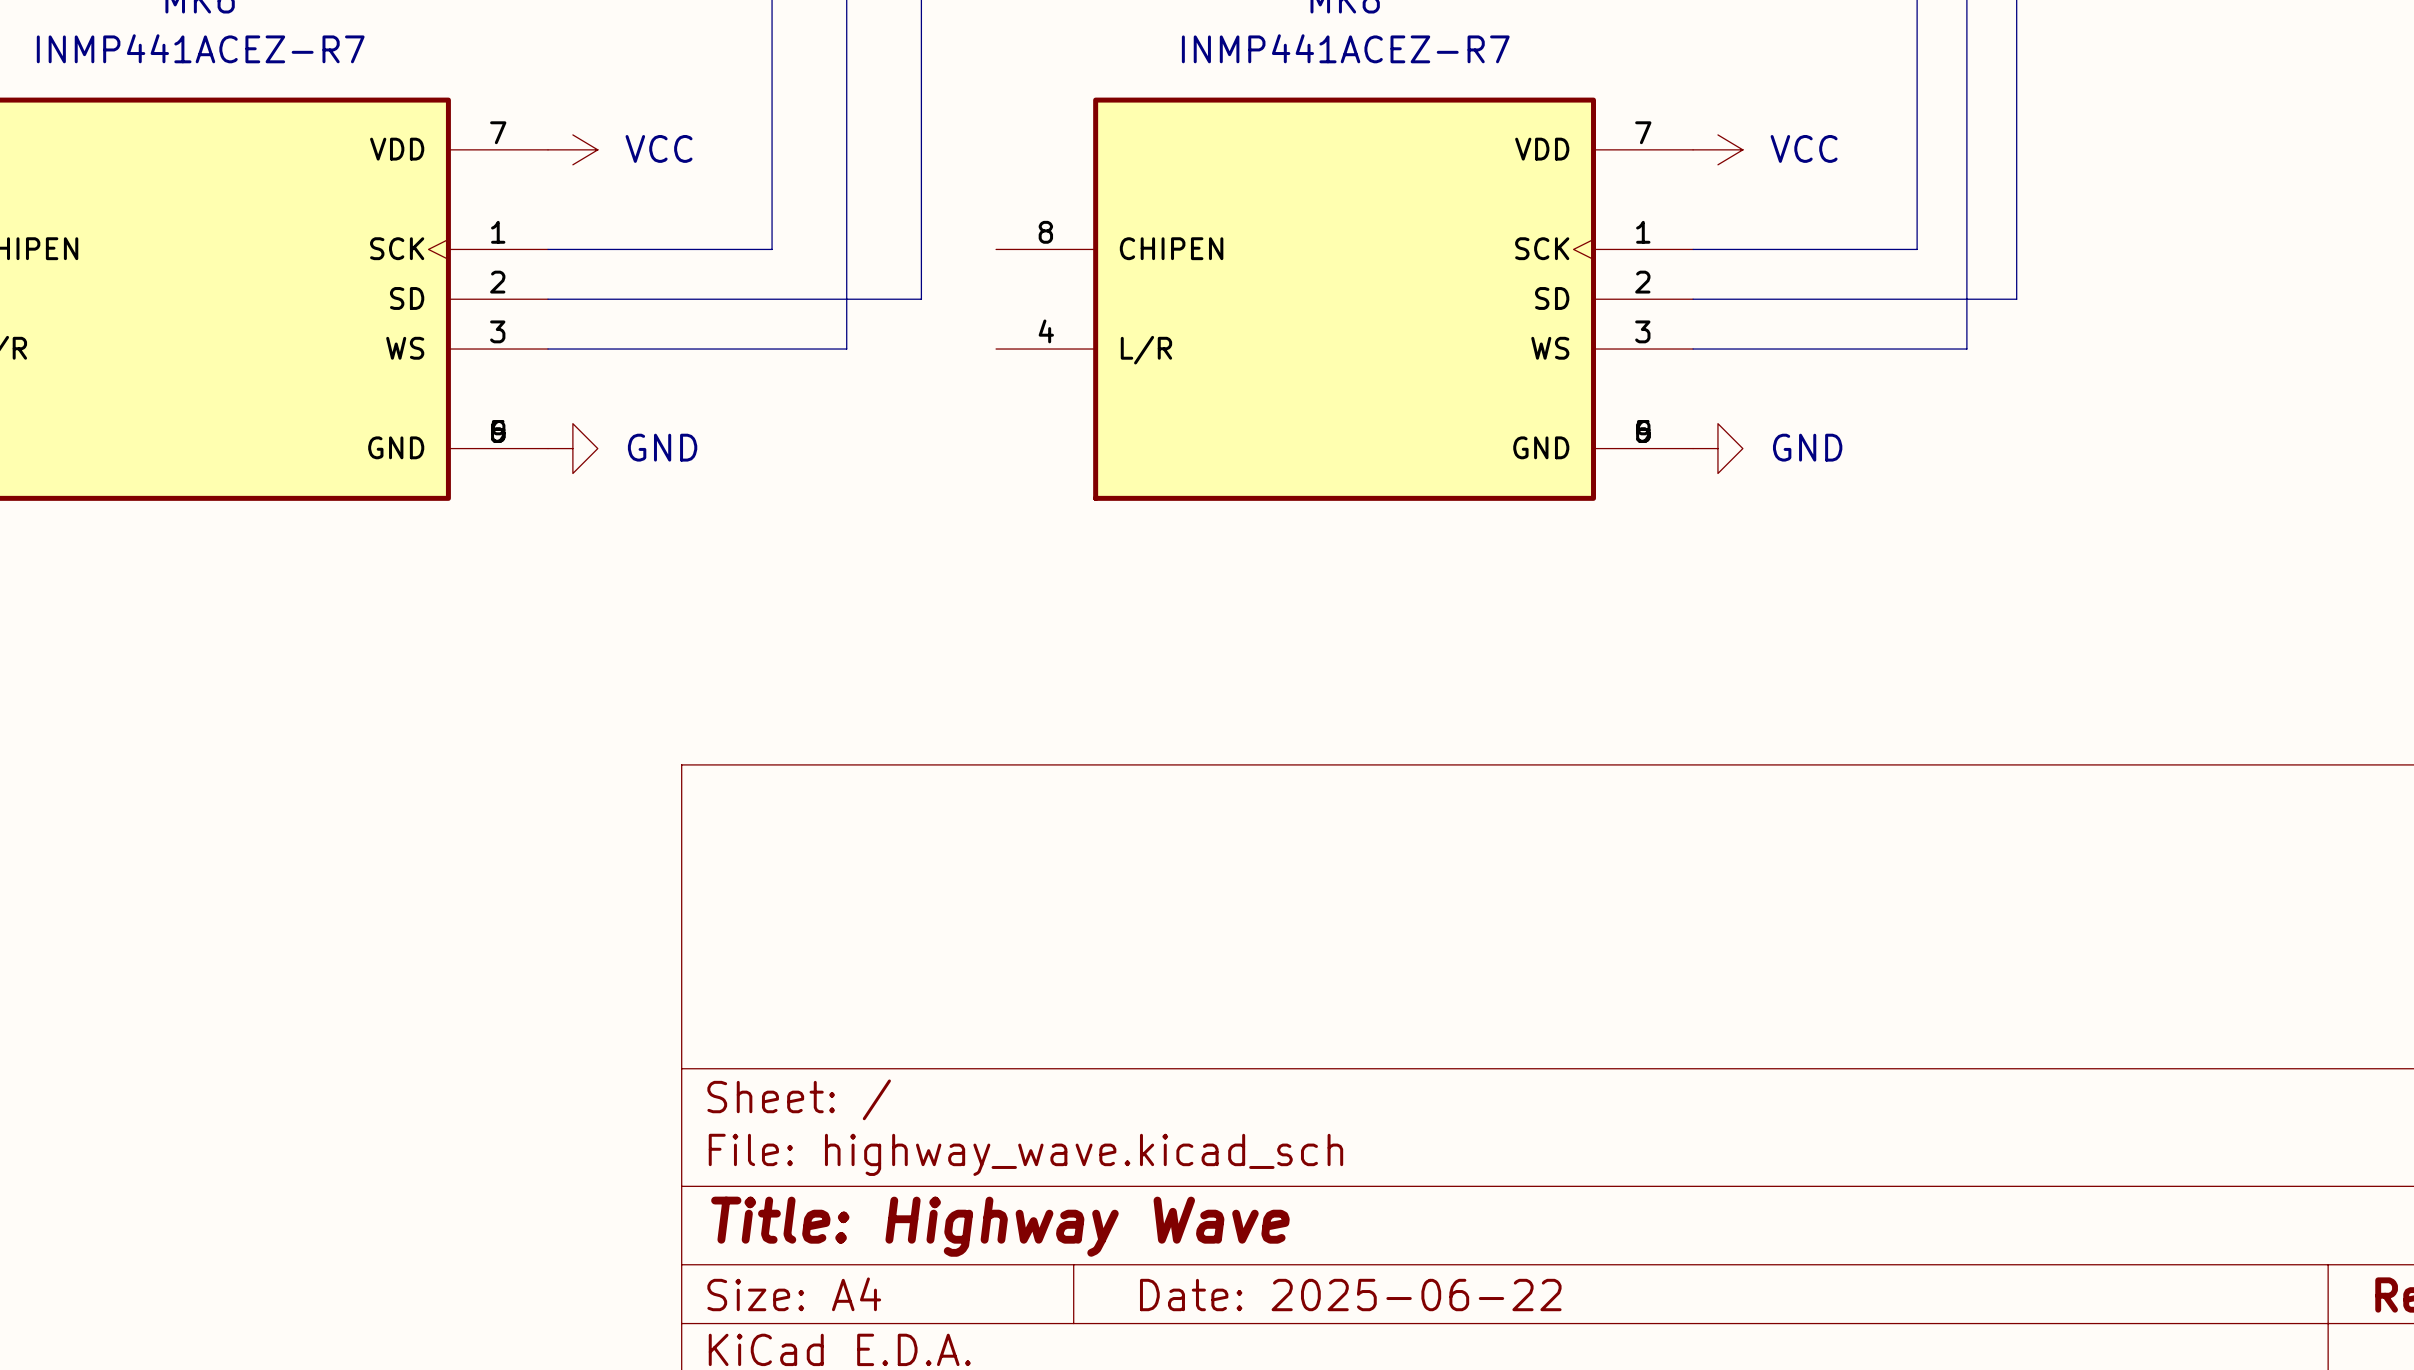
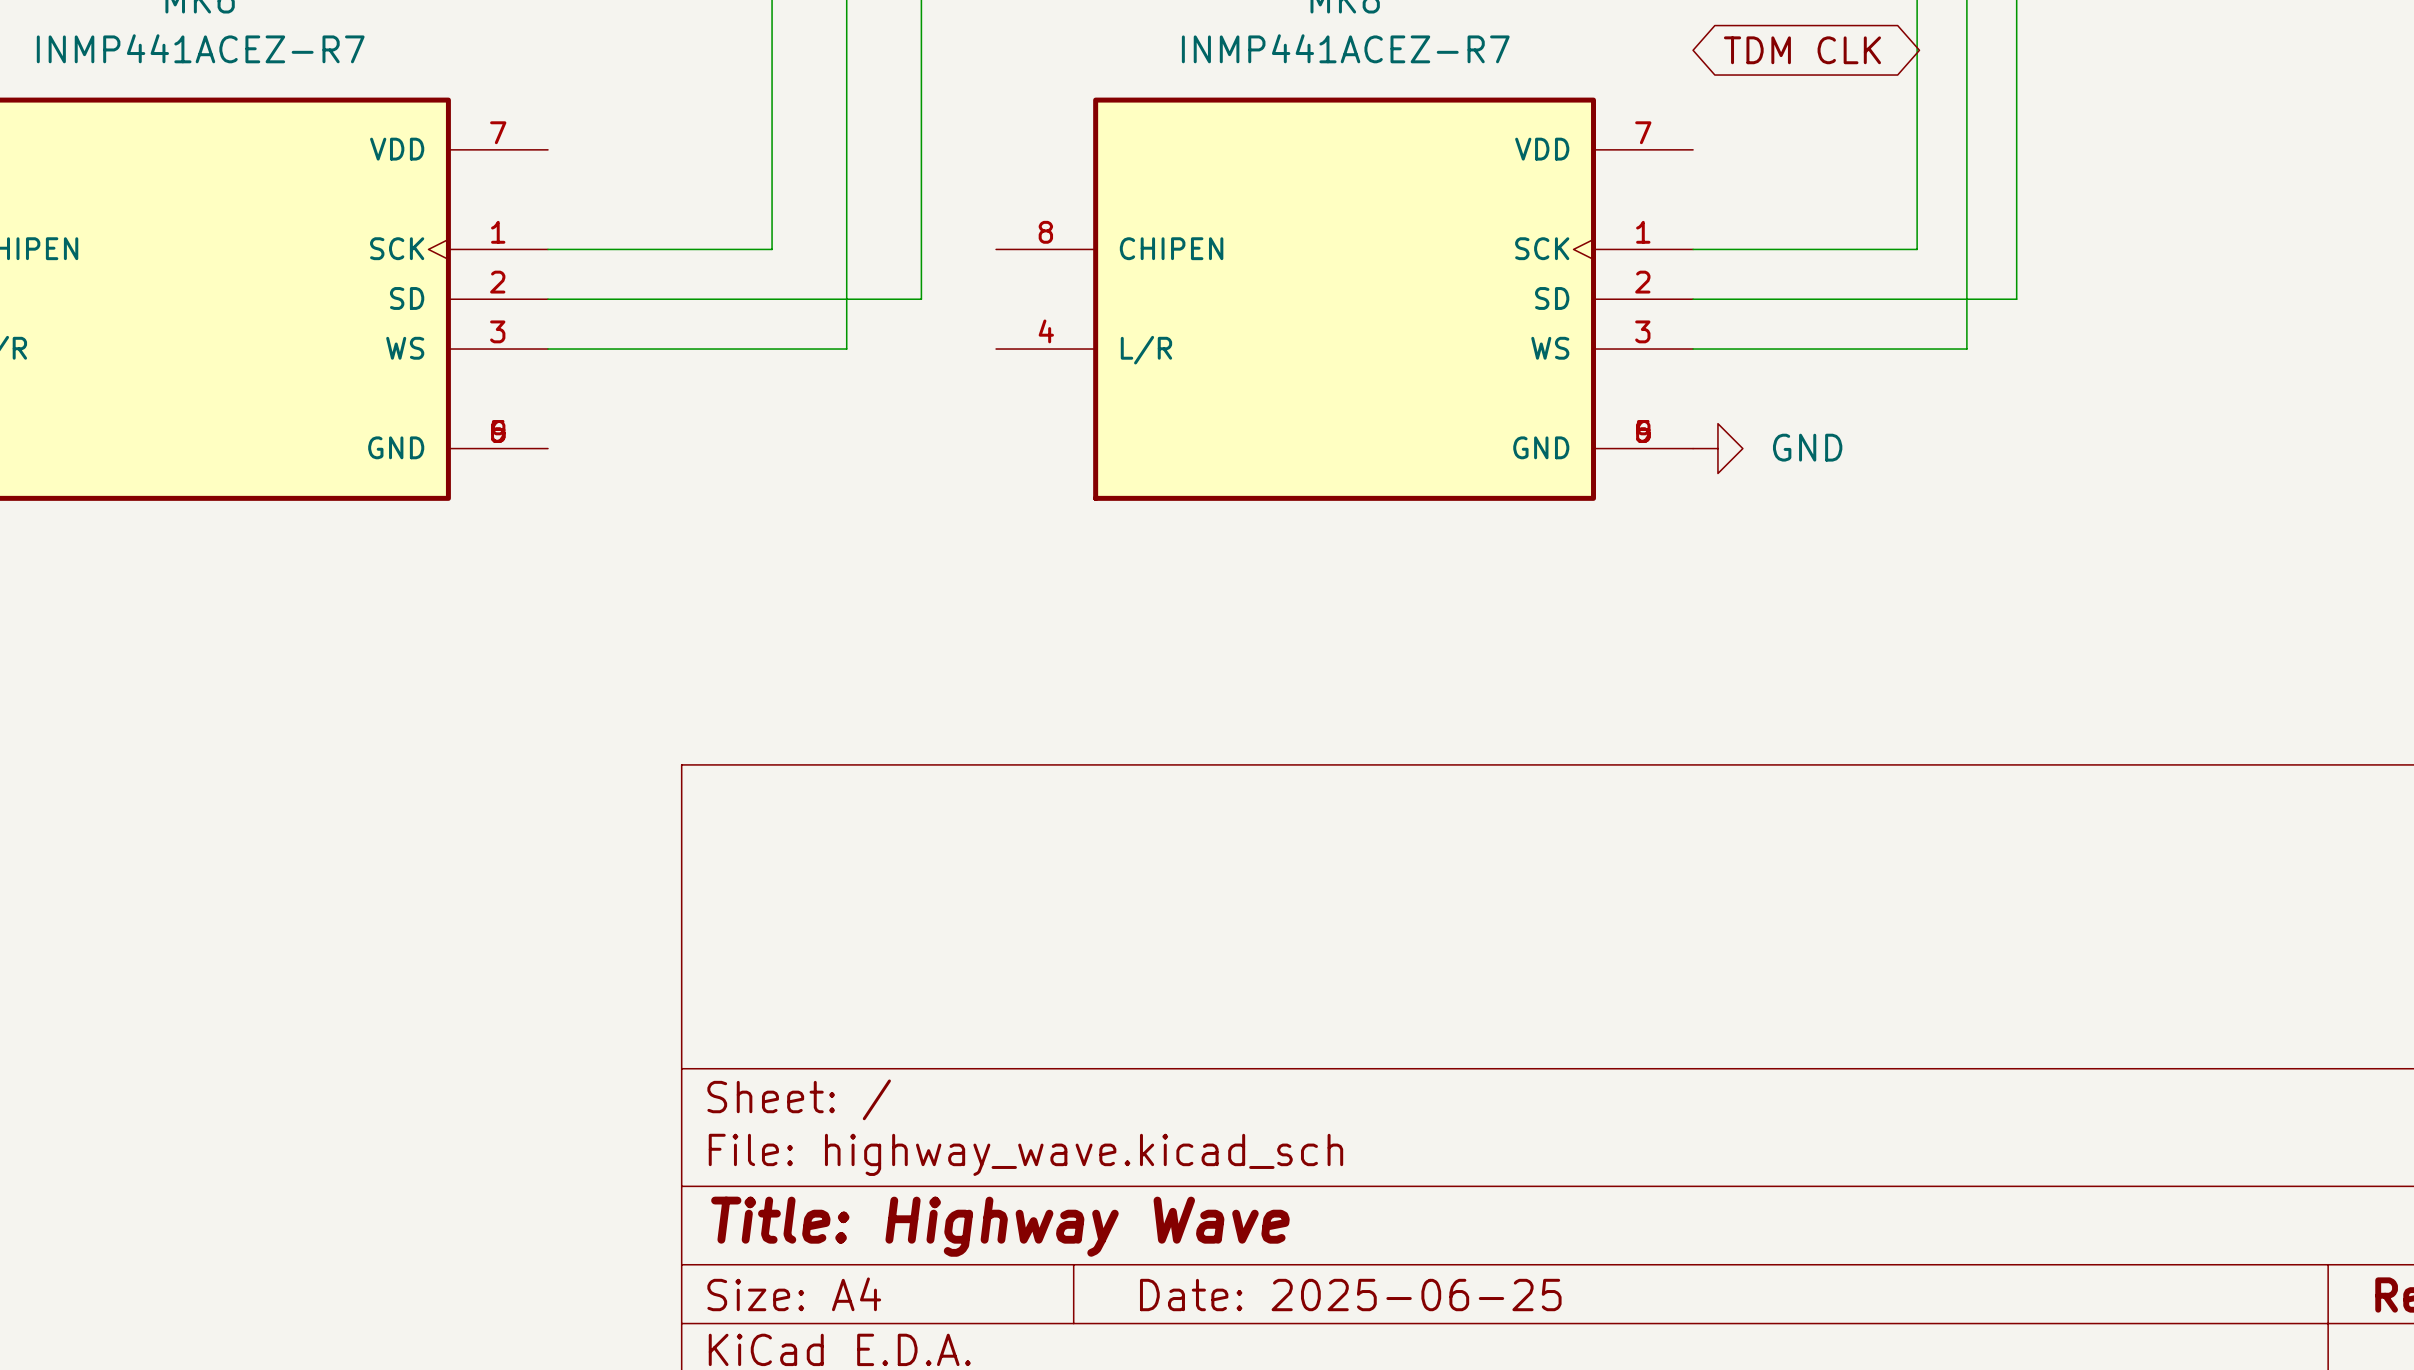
global label: none -> TDM CLK (1802, 50)
power symbol: VCC (572, 149) -> none
power symbol: VCC (1717, 149) -> none
power symbol: GND (572, 448) -> none
title block: Date: 2025-06-22 (1350, 1295) -> Date: 2025-06-25 (1350, 1295)

